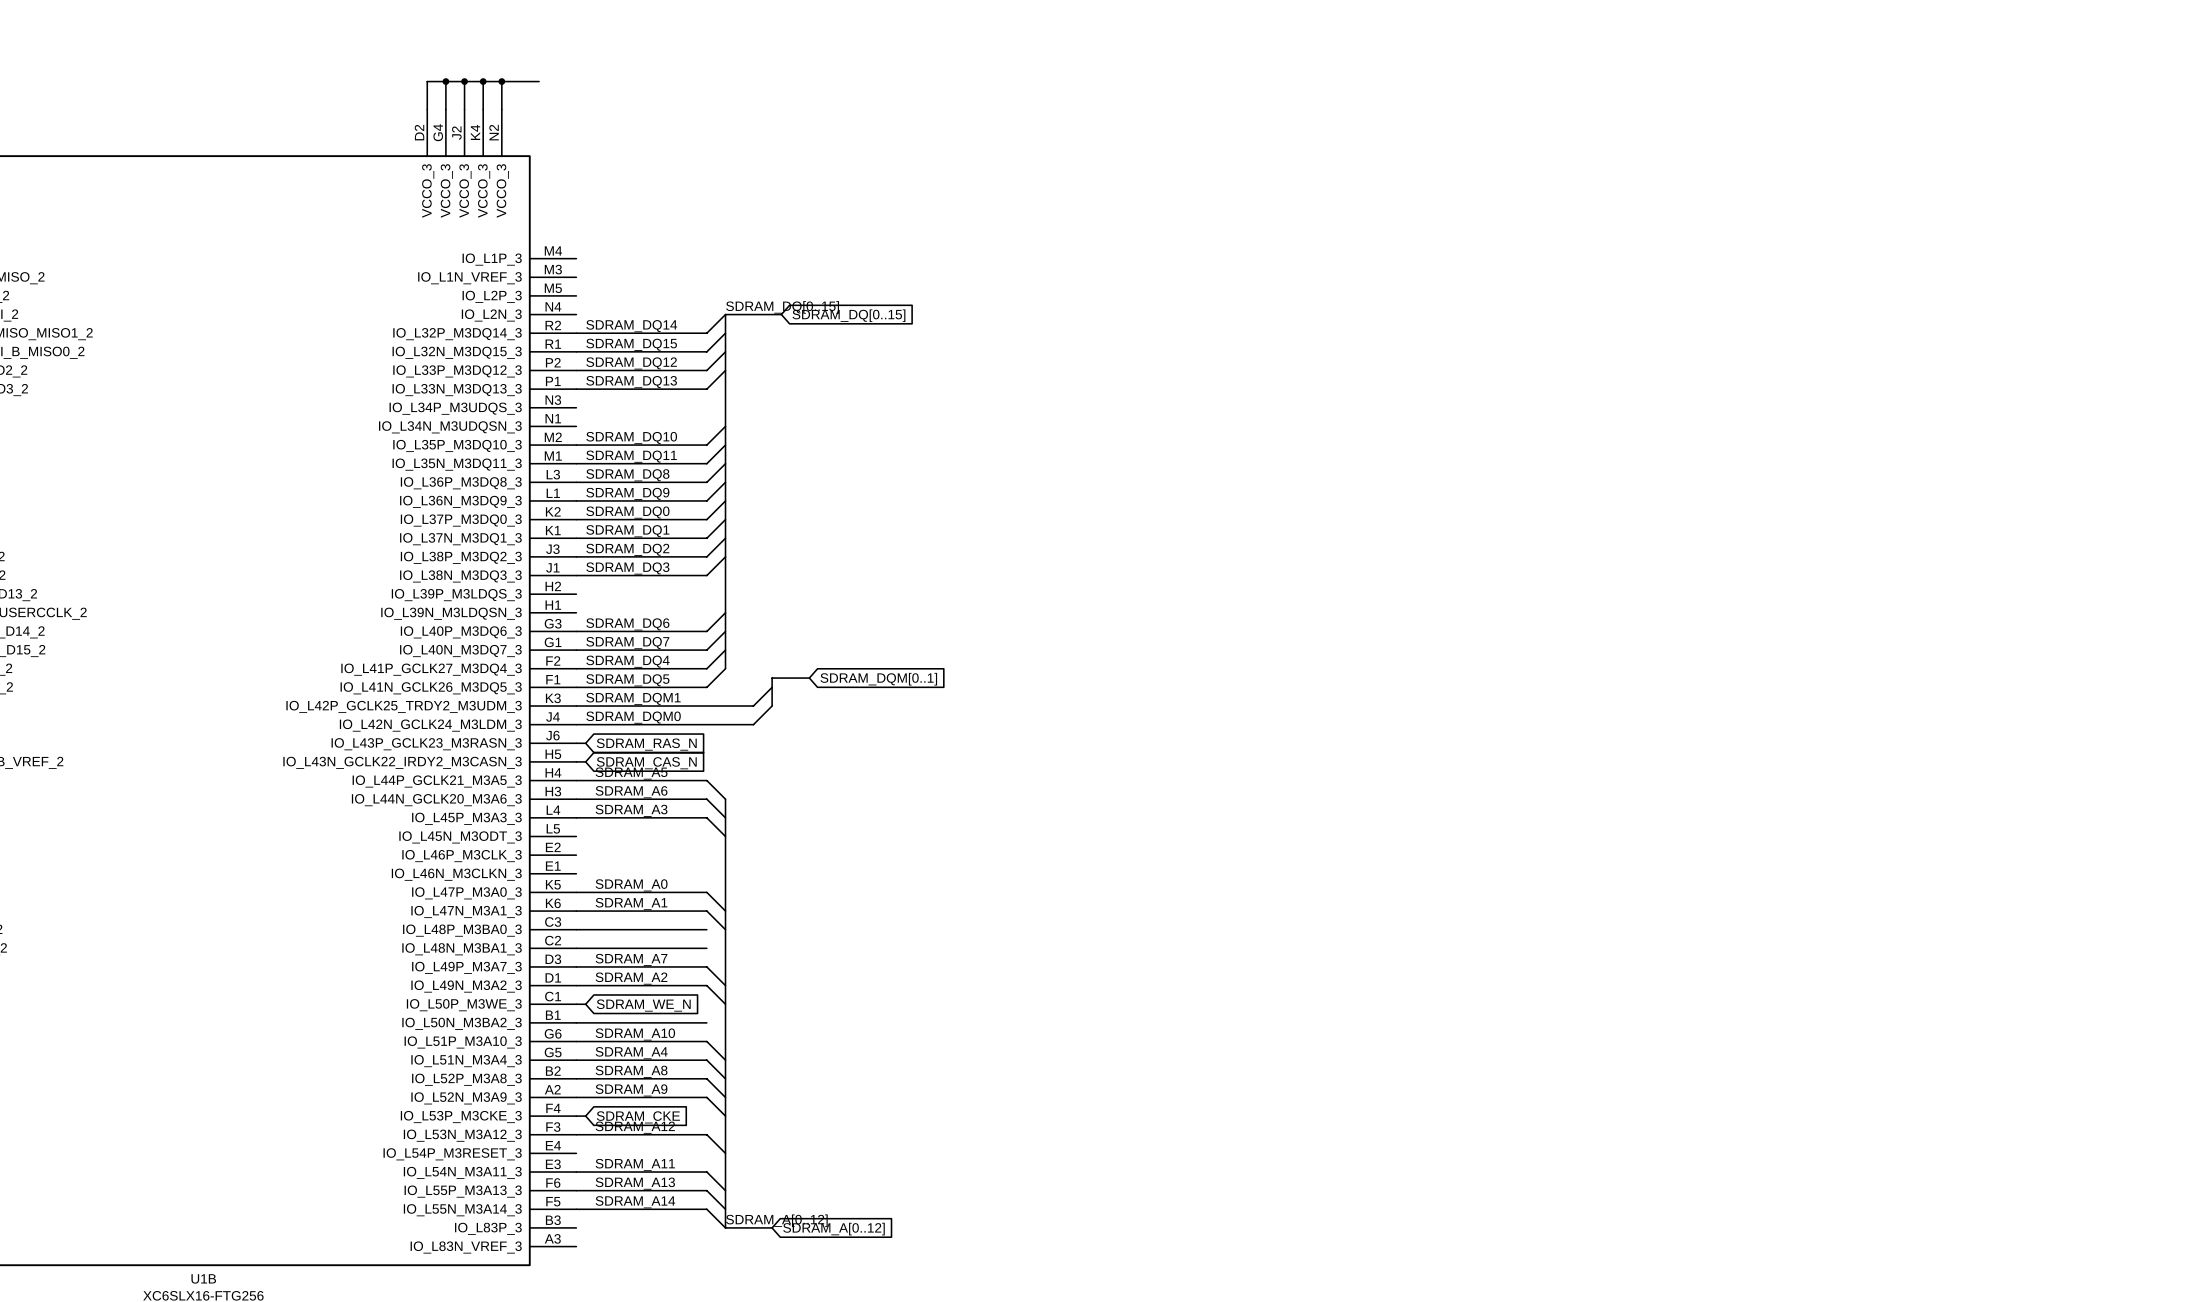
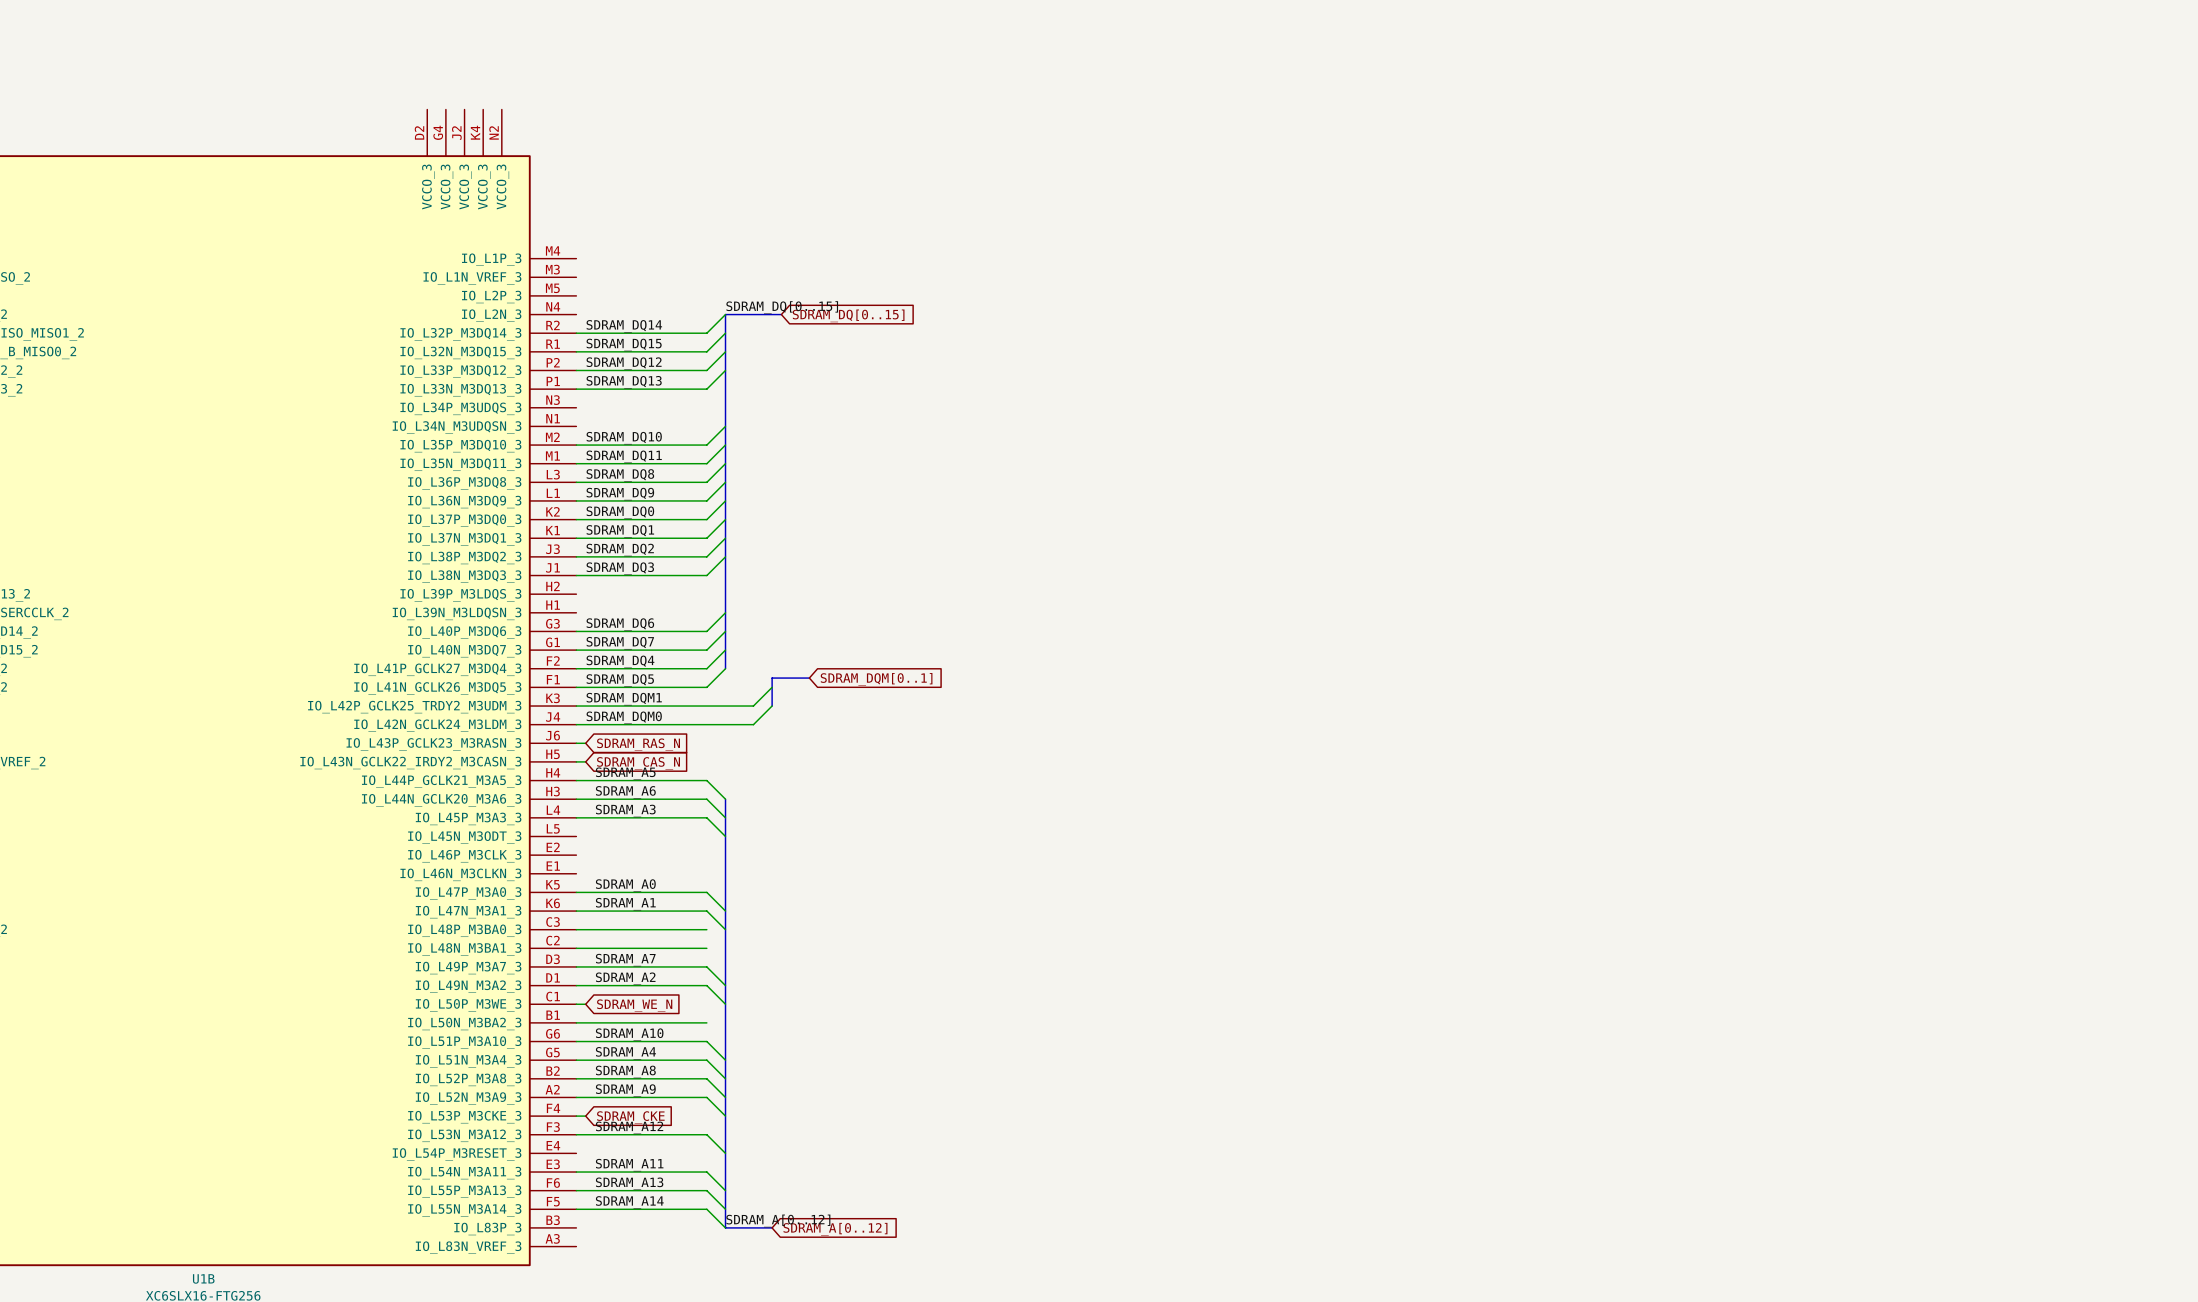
wire: (445, 81) (445, 109) -> none
junction: (445, 81) -> none
wire: (464, 81) (464, 109) -> none
junction: (464, 81) -> none
wire: (483, 81) (483, 109) -> none
junction: (483, 81) -> none
wire: (501, 81) (501, 109) -> none
junction: (501, 81) -> none
wire: (539, 81) (427, 81) (427, 109) -> none

